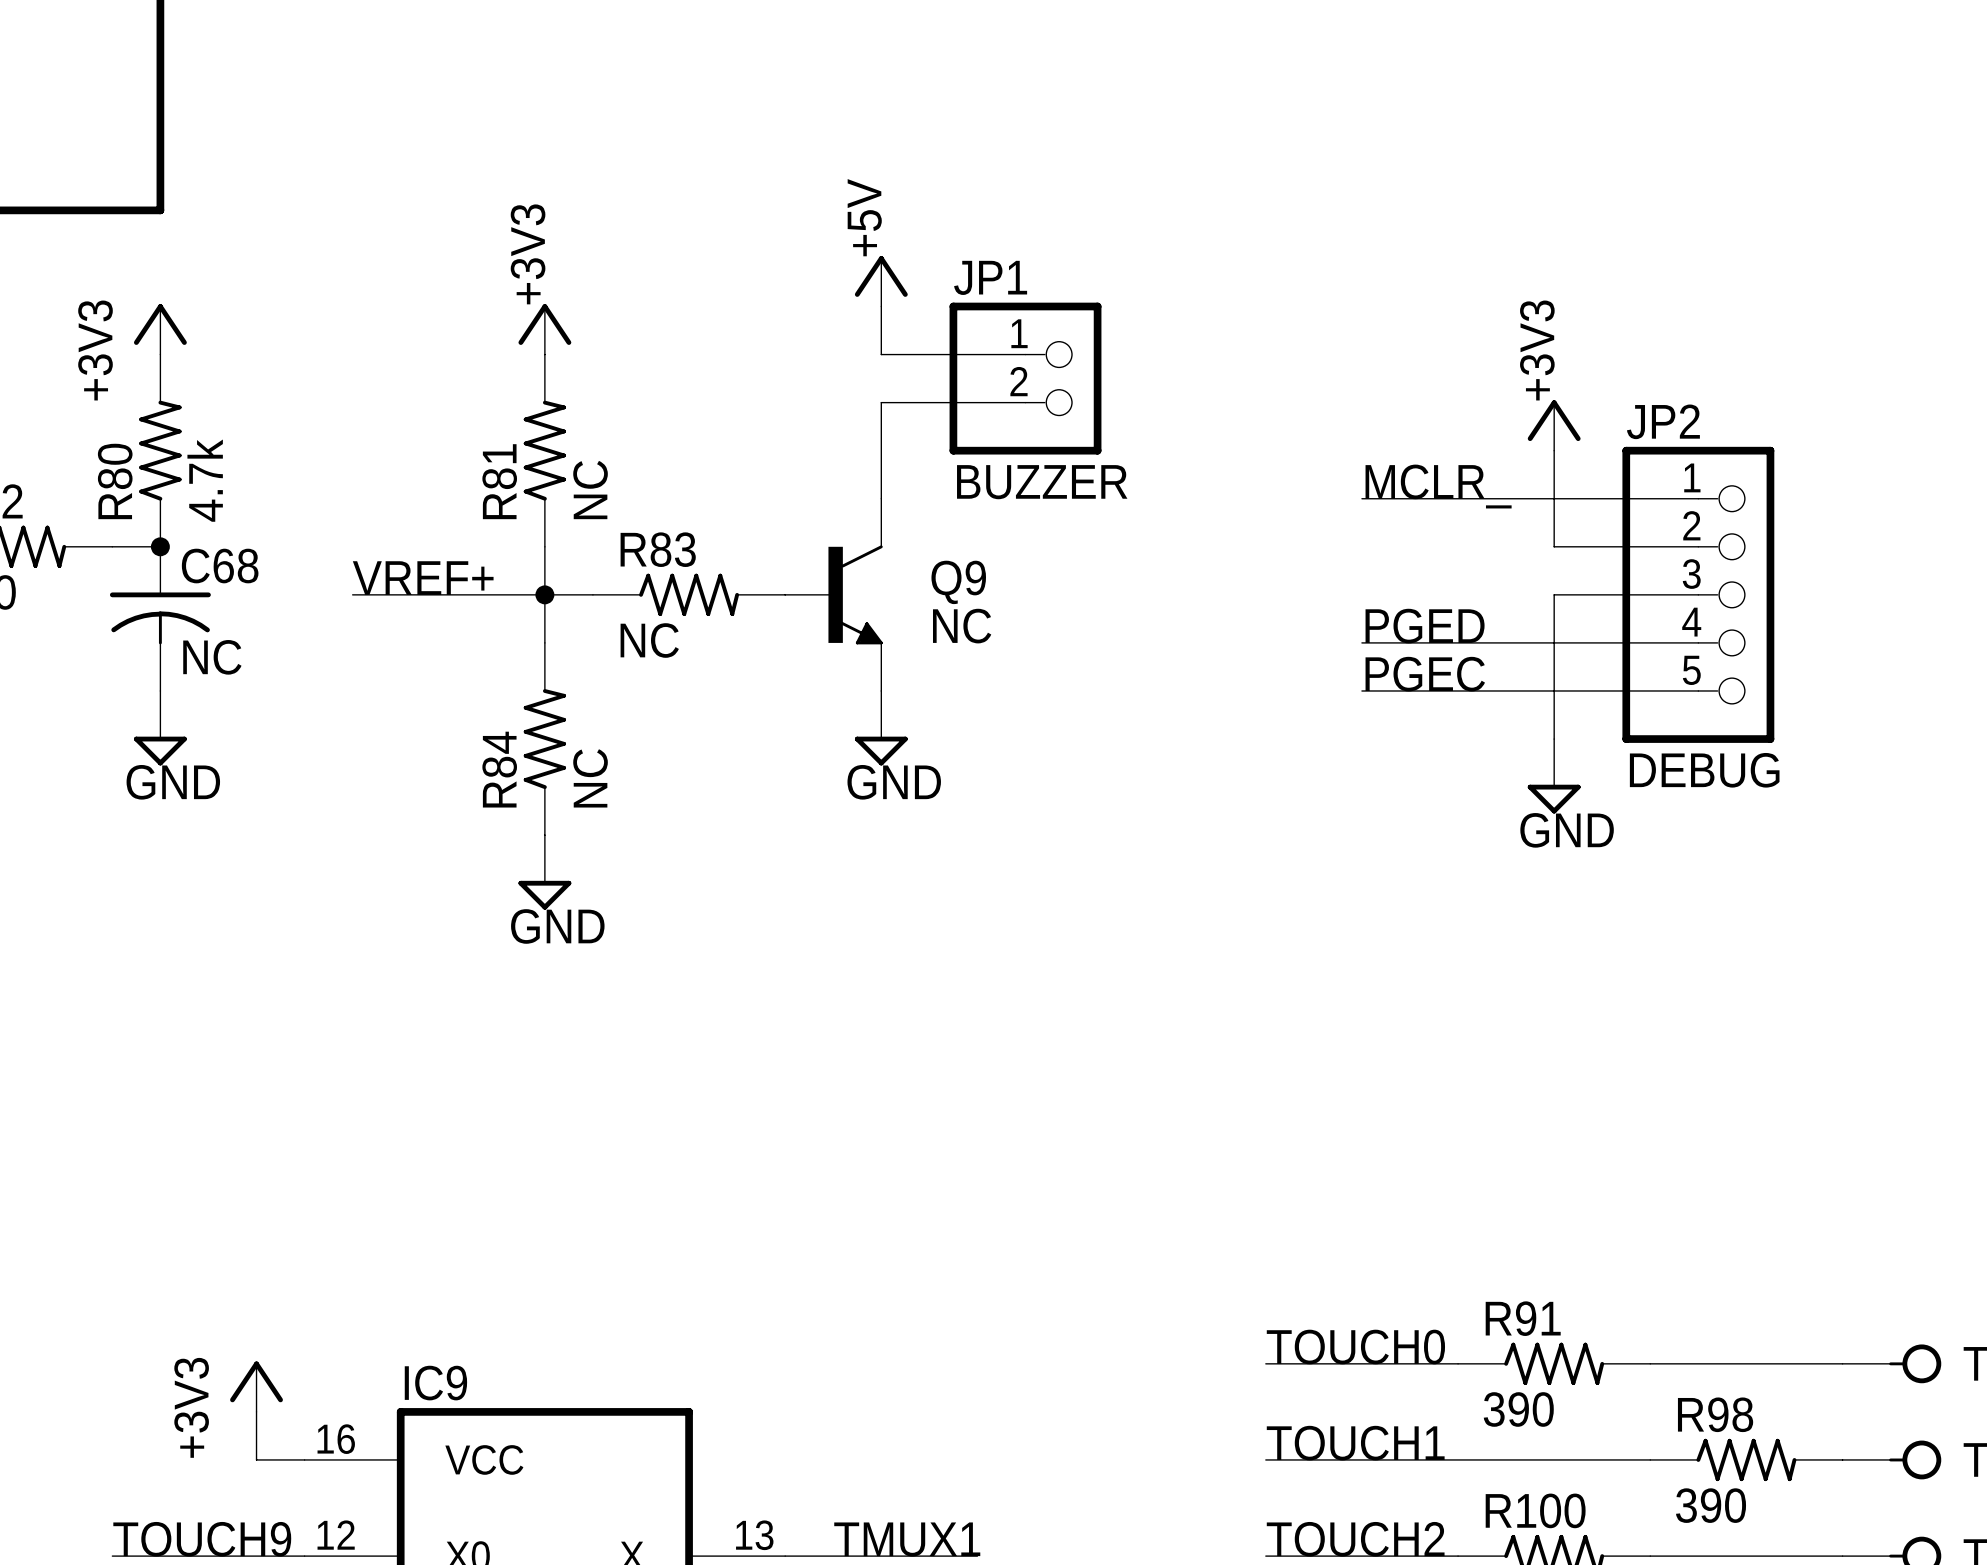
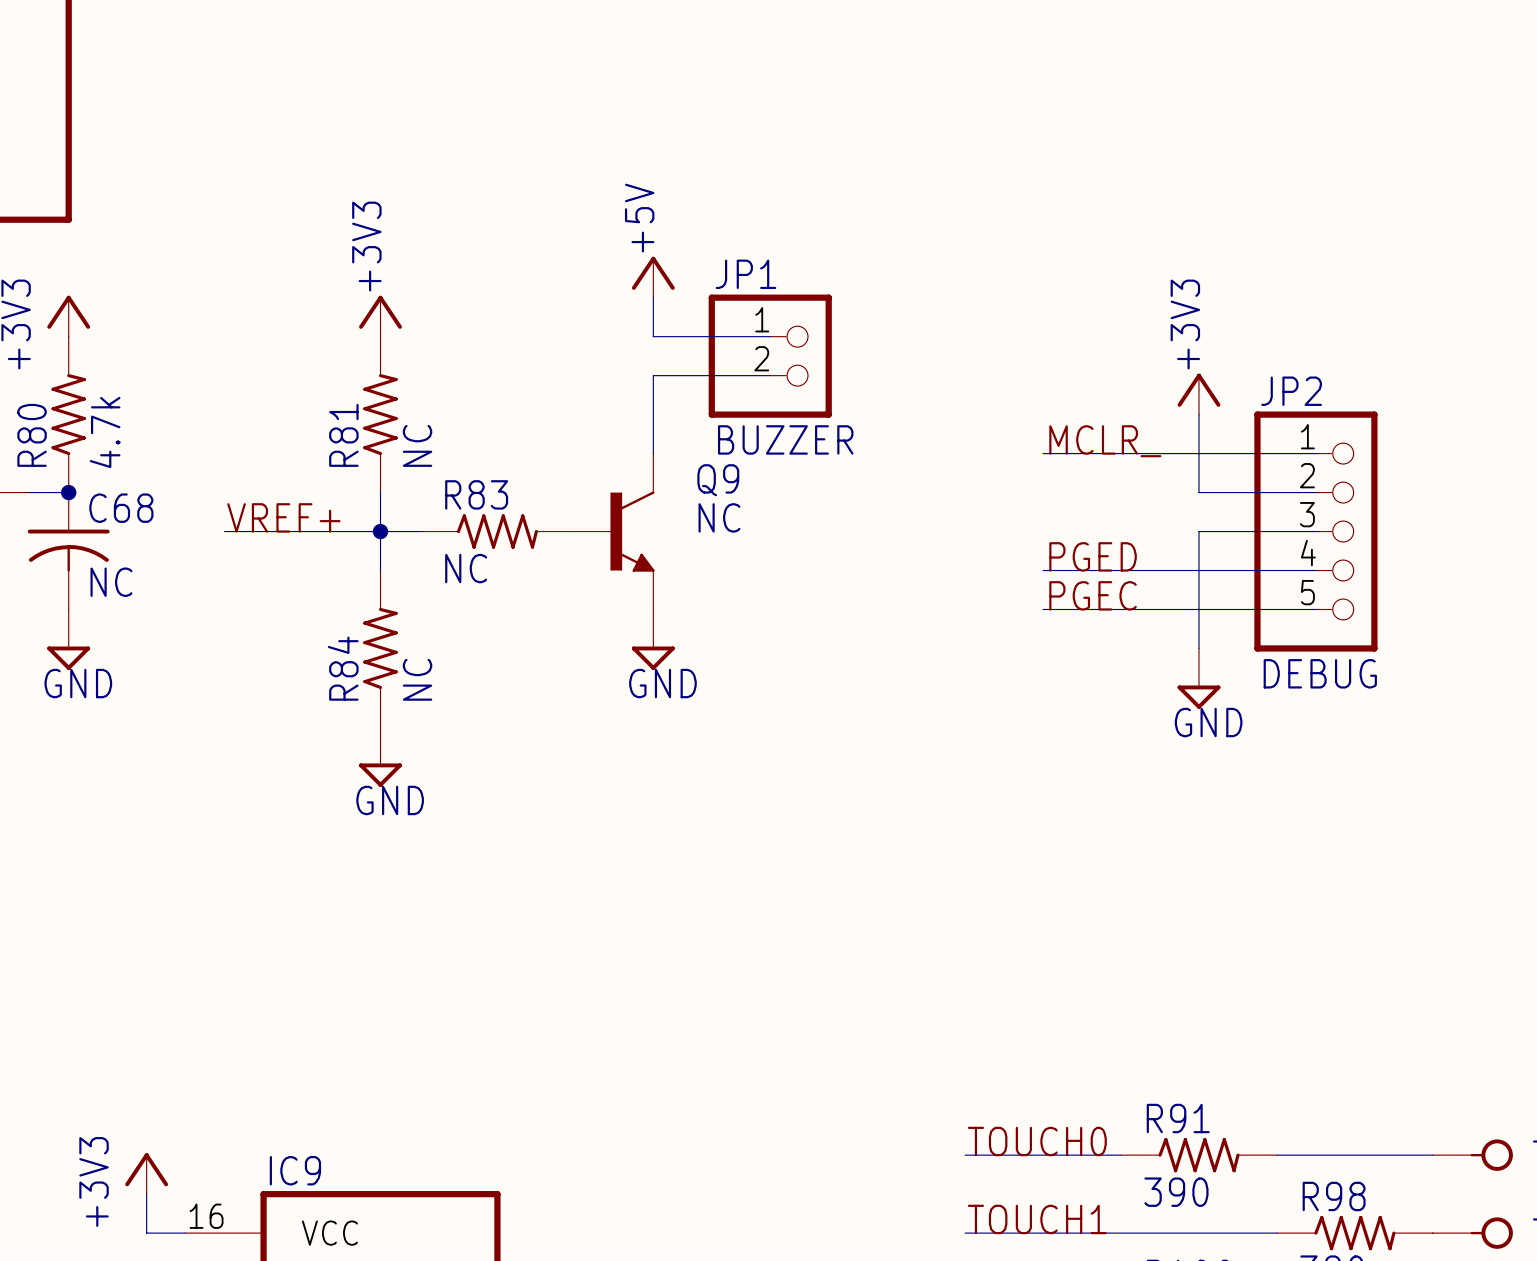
Q9 name position: Q9 (958, 582) -> Q9 (718, 480)
Q9 value position: NC (962, 626) -> NC (719, 517)

